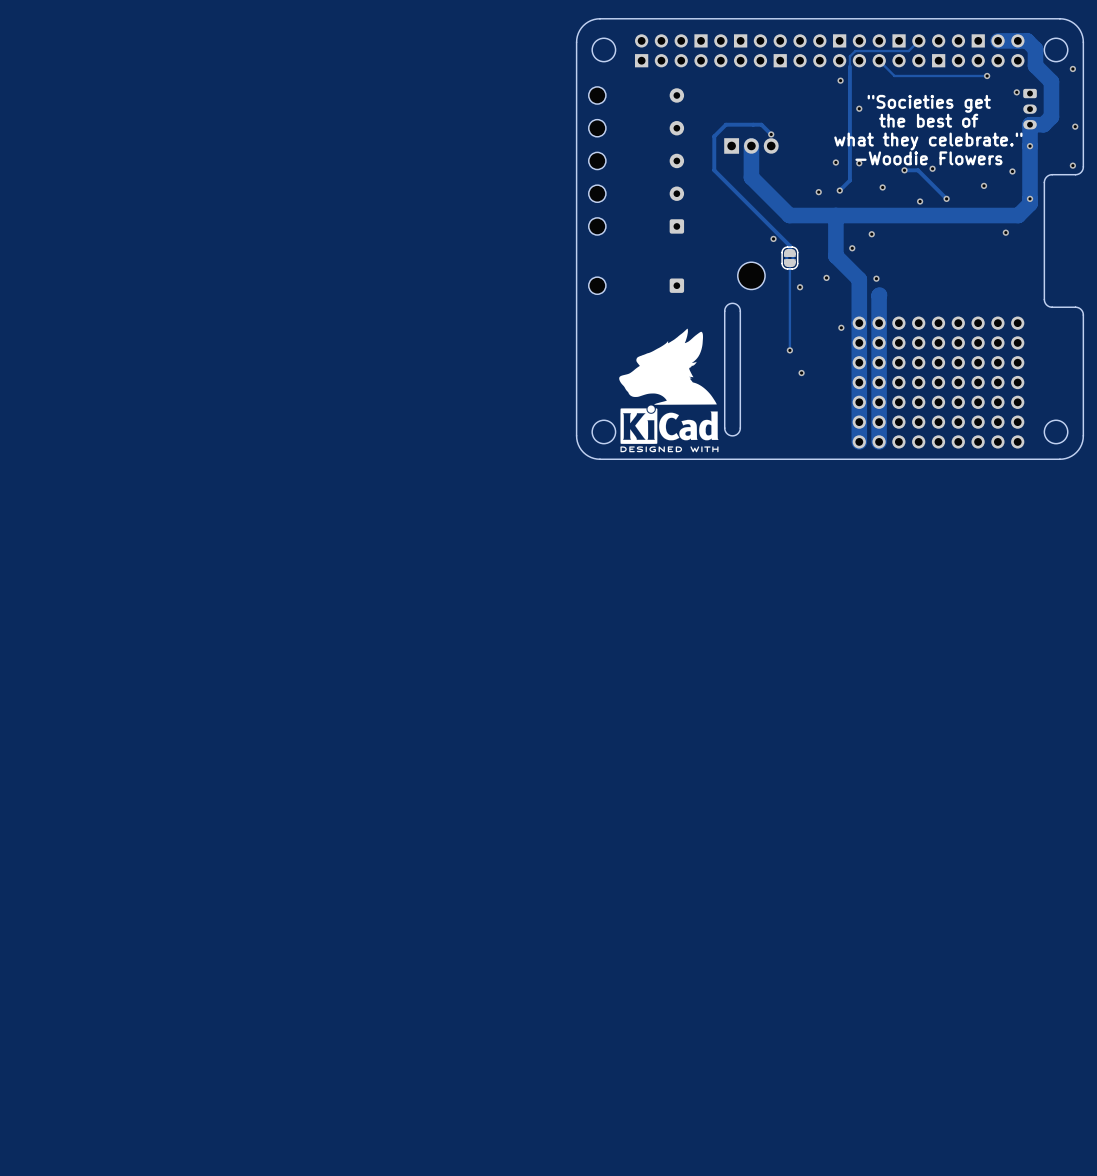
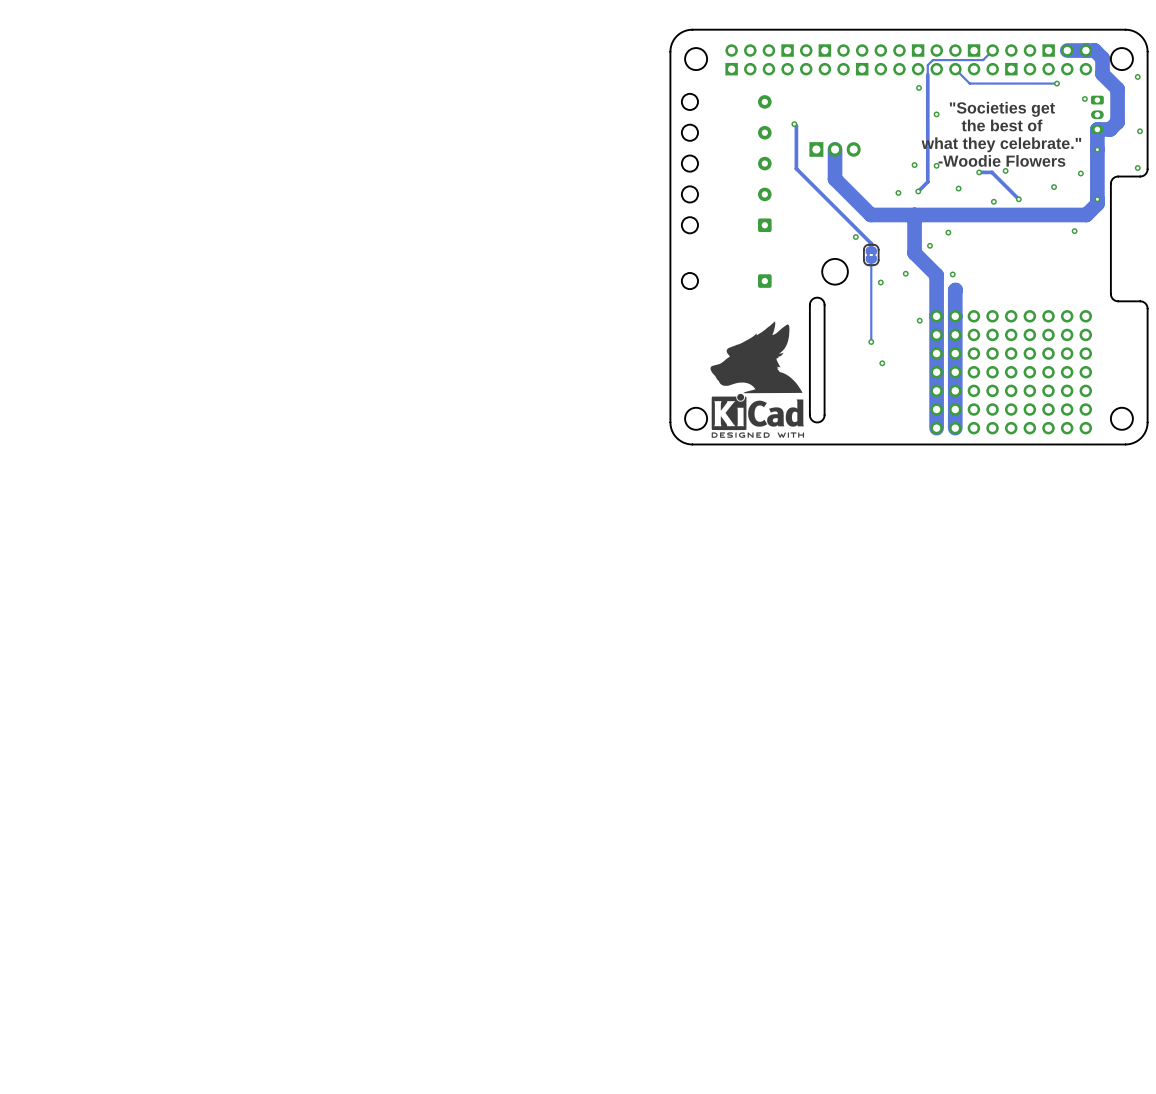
via: none -> (794, 124)
track: (771, 134) (761, 124) (725, 124) (714, 136) (714, 170) -> (794, 124) (796, 126) (796, 168) (800, 172)
via: (771, 134) -> none

